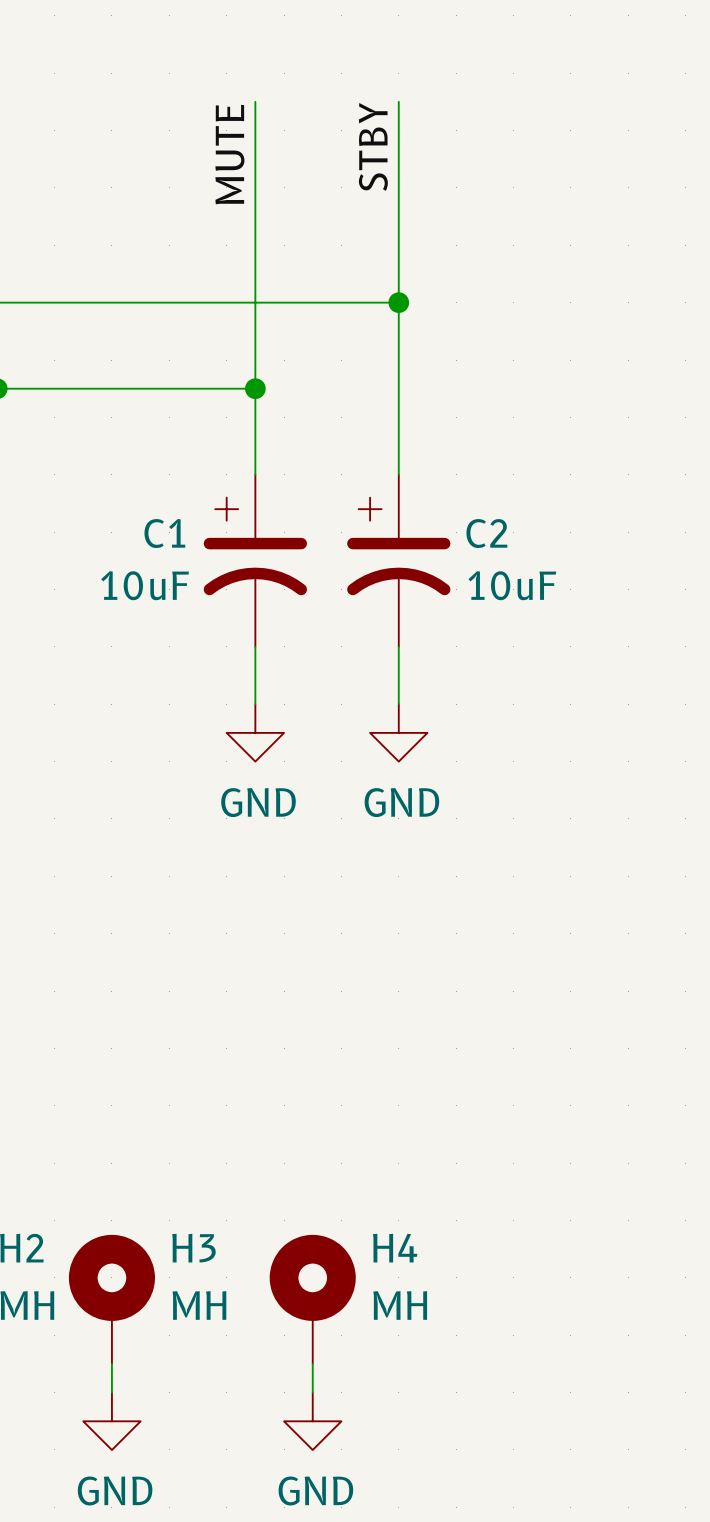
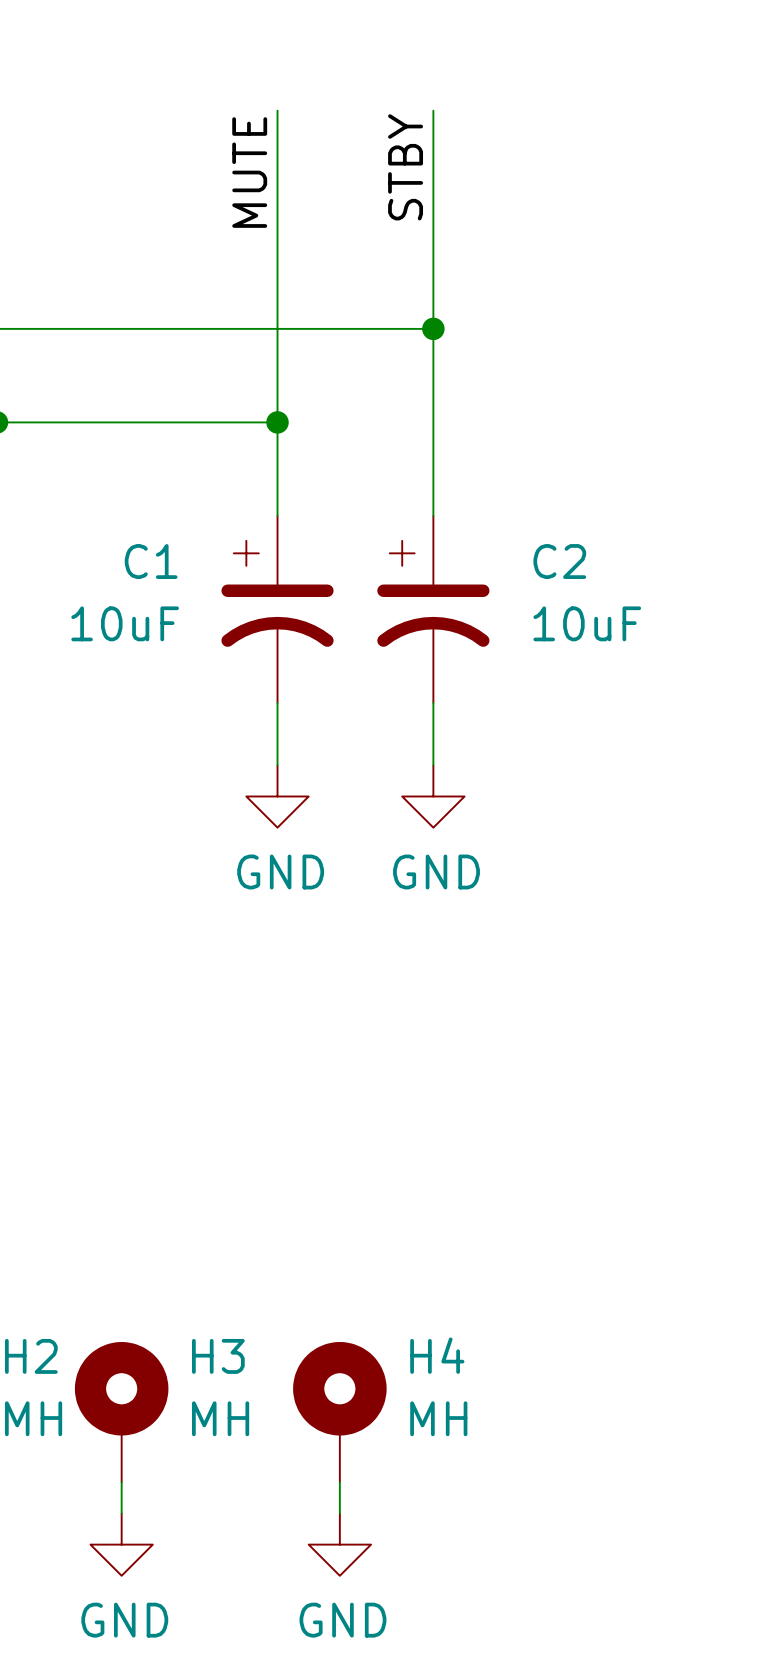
C1 name position: C1 (164, 533) -> C1 (151, 561)
C2 name position: C2 (486, 533) -> C2 (559, 561)
C1 value position: 10uF (145, 585) -> 10uF (125, 623)
C2 value position: 10uF (512, 585) -> 10uF (587, 623)

